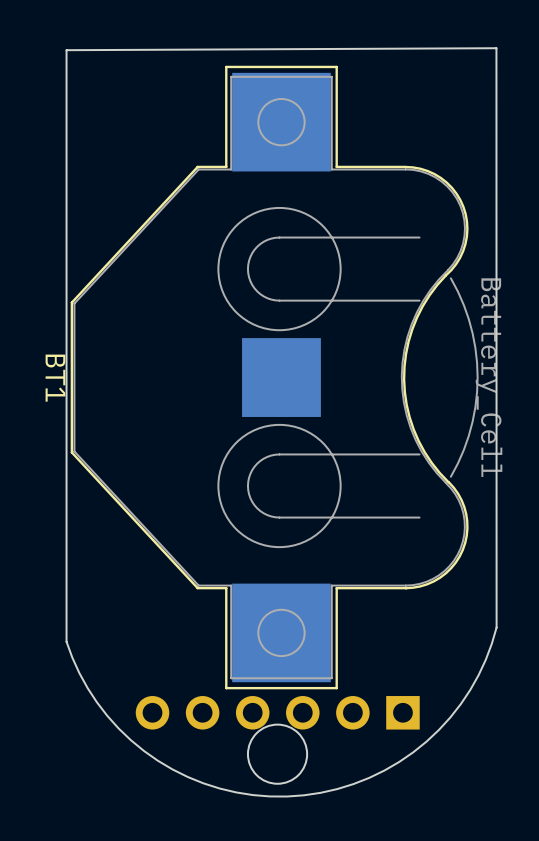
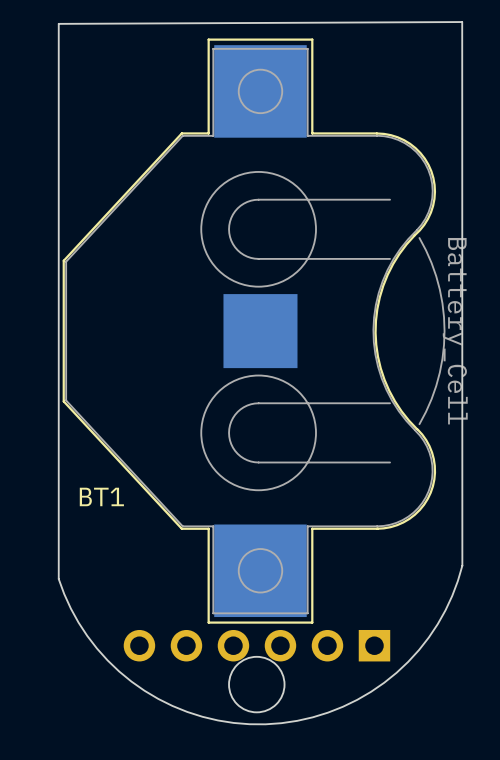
BT1 name rotation: 0° (55, 378) -> 90° counterclockwise (101, 496)
BT1 name position: BT1 (55, 378) -> BT1 (101, 496)

